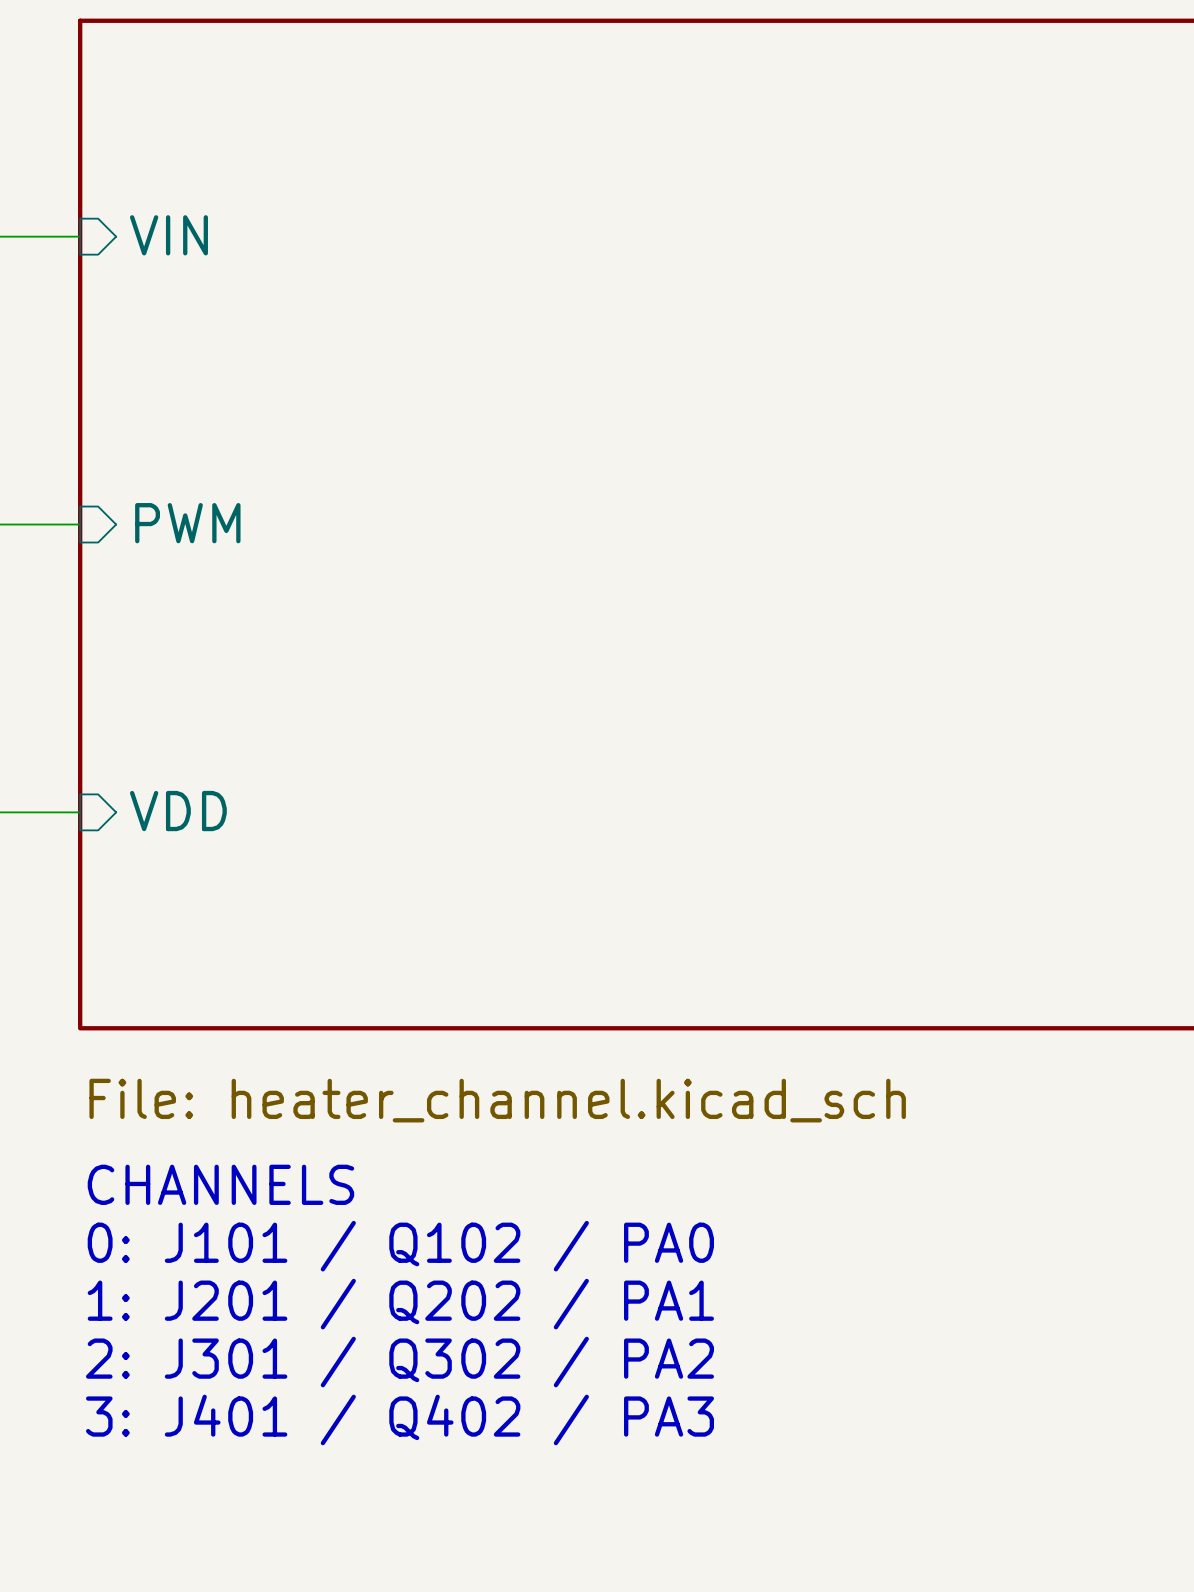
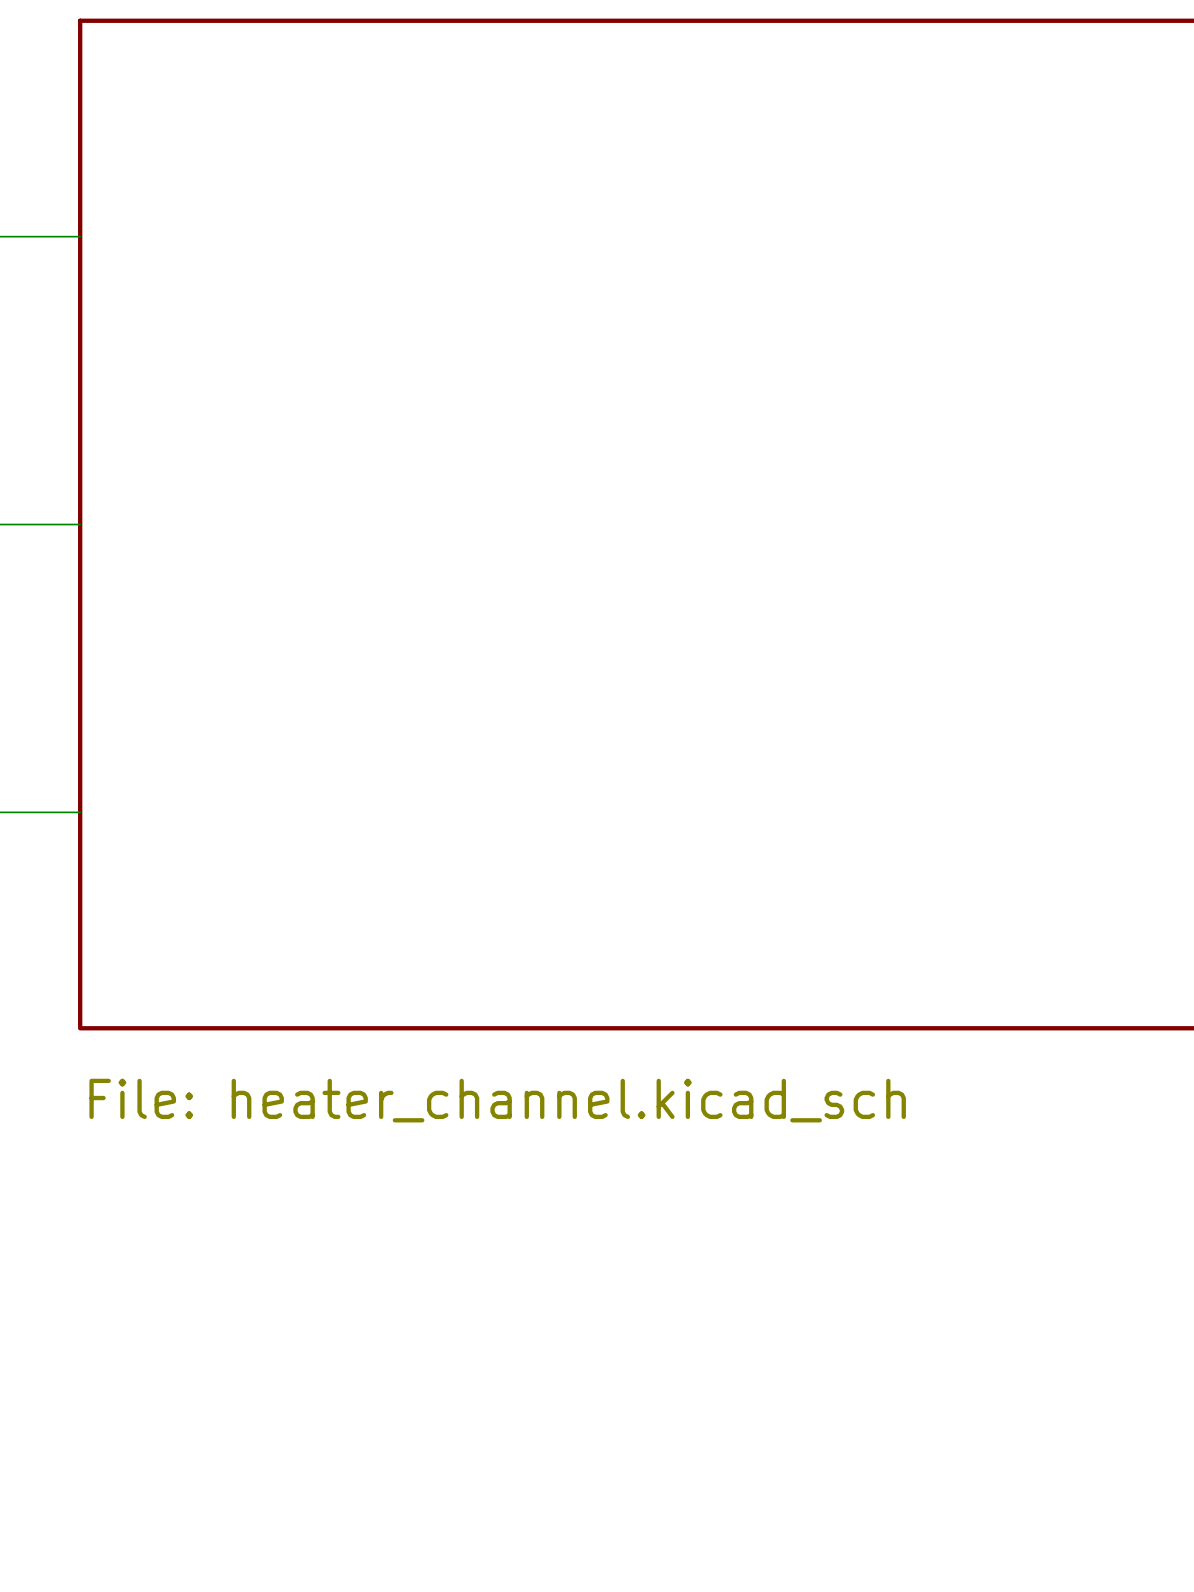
sheet pin: VIN (168, 235) -> none
sheet pin: PWM (187, 523) -> none
sheet pin: VDD (178, 811) -> none
text: CHANNELS (220, 1184) -> none
text: 0: J101 / Q102 / PA0 (400, 1246) -> none
text: 1: J201 / Q202 / PA1 (400, 1304) -> none
text: 2: J301 / Q302 / PA2 (400, 1362) -> none
text: 3: J401 / Q402 / PA3 (400, 1419) -> none

